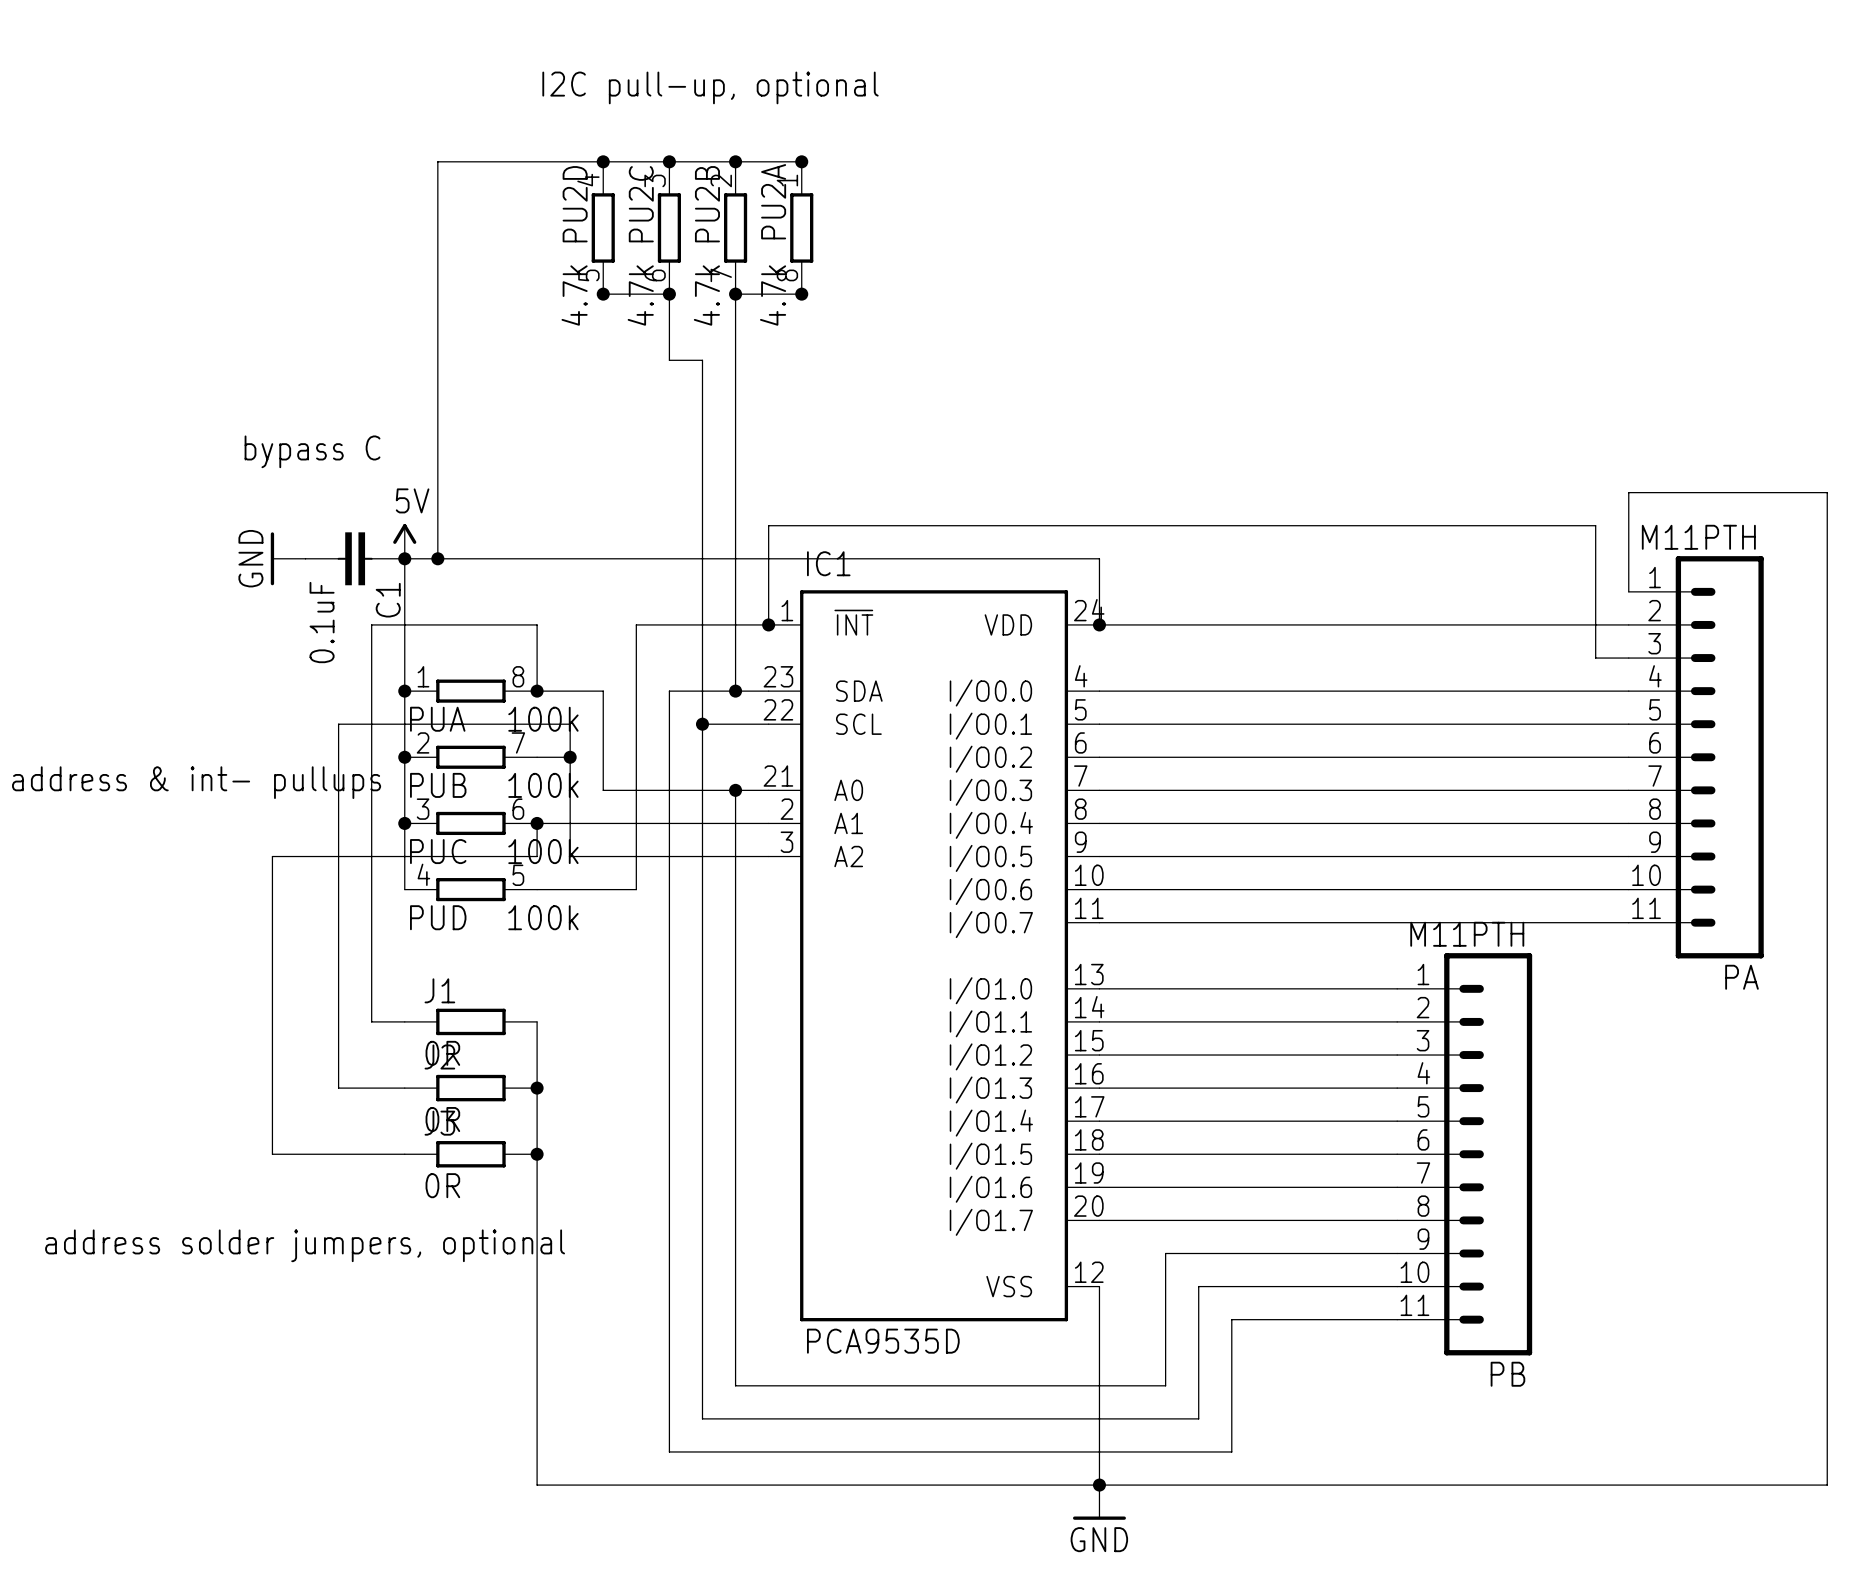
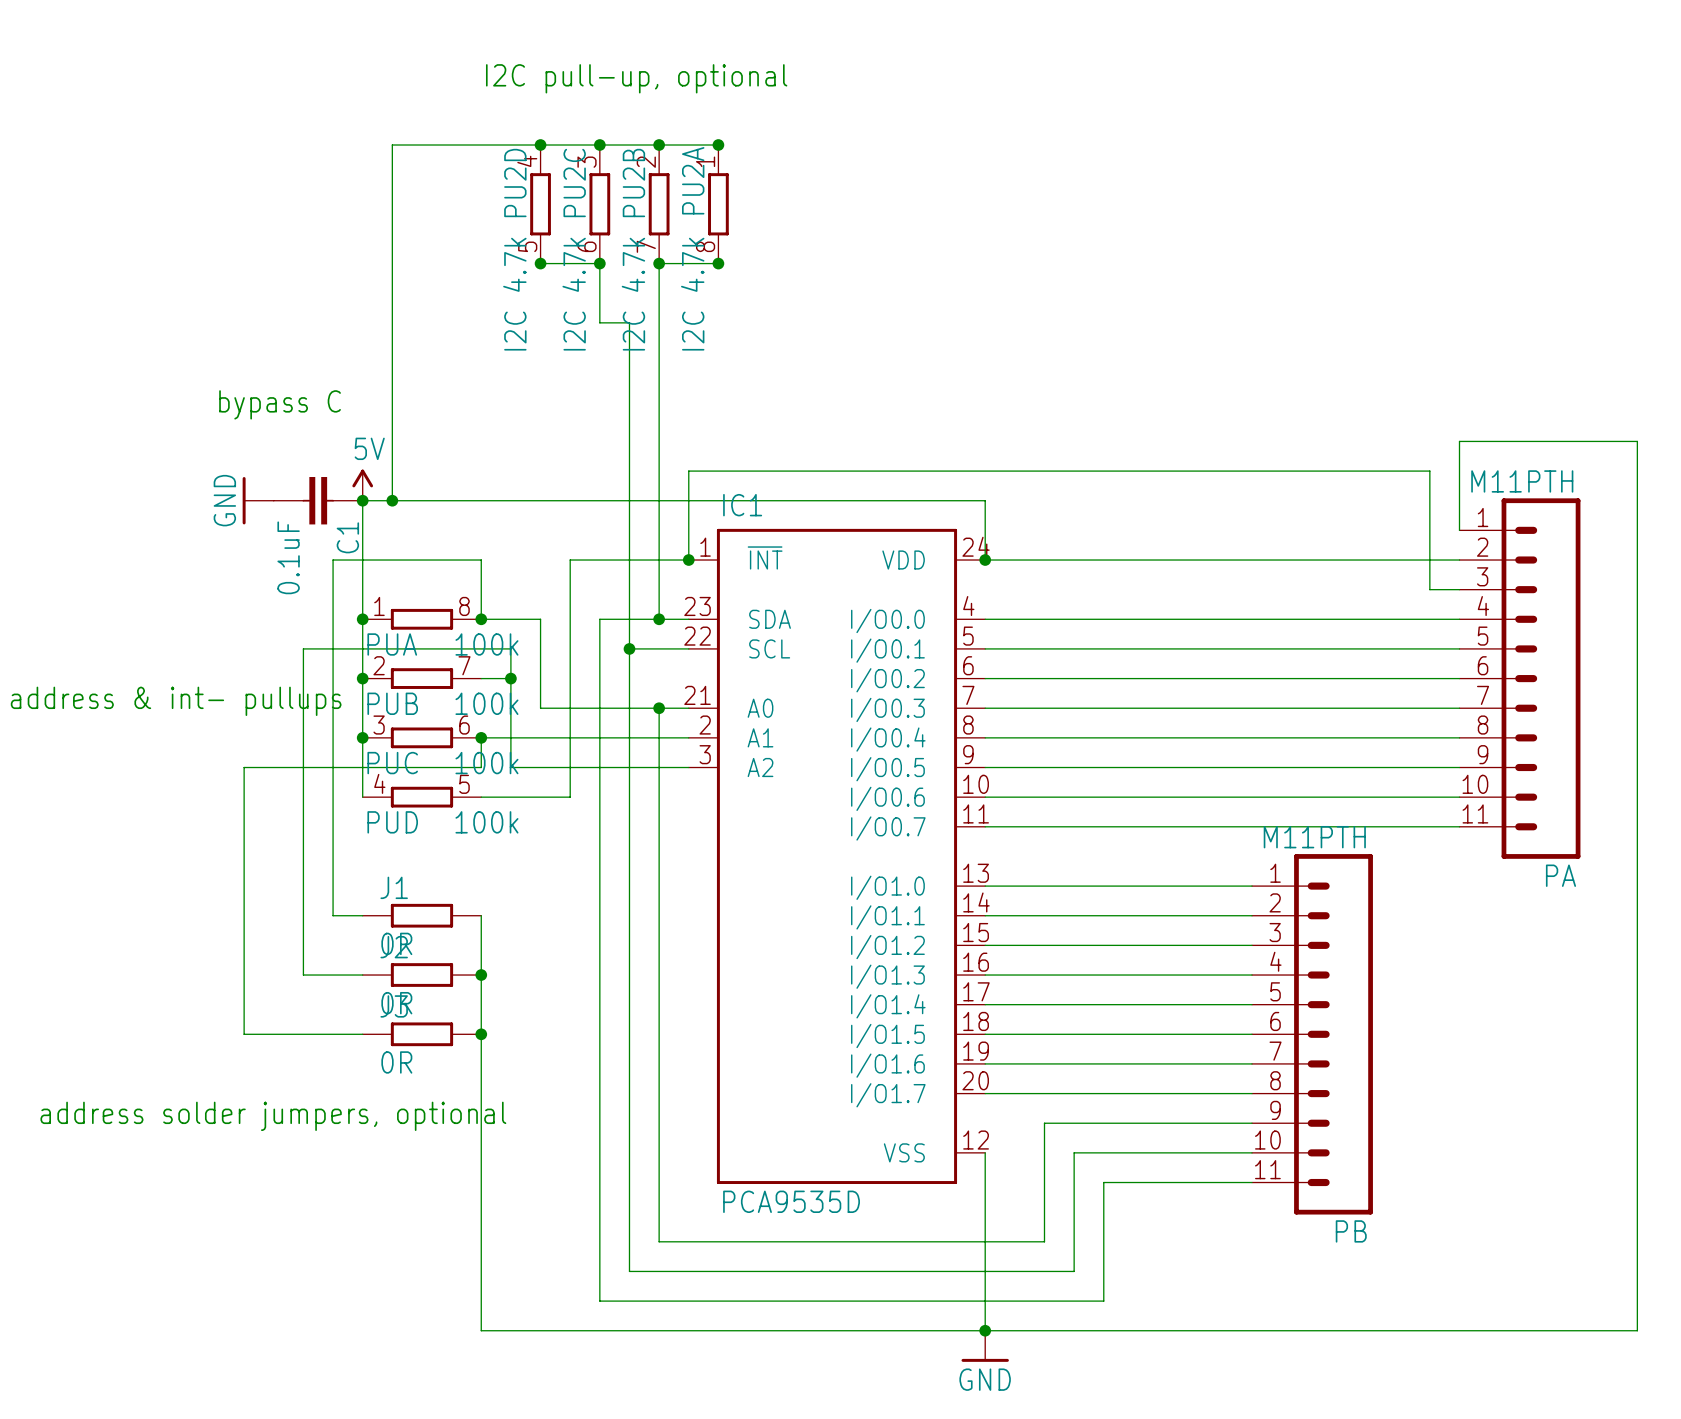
PU2D value: 4.7k (574, 295) -> I2C 4.7k (514, 294)
PU2C value: 4.7k (640, 295) -> I2C 4.7k (574, 294)
PU2B value: 4.7k (706, 295) -> I2C 4.7k (633, 294)
PU2A value: 4.7k (773, 295) -> I2C 4.7k (692, 294)

